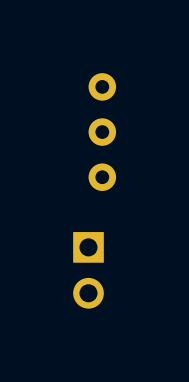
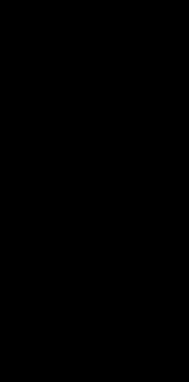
part: (102, 132) -> none
part: (88, 270) -> none

